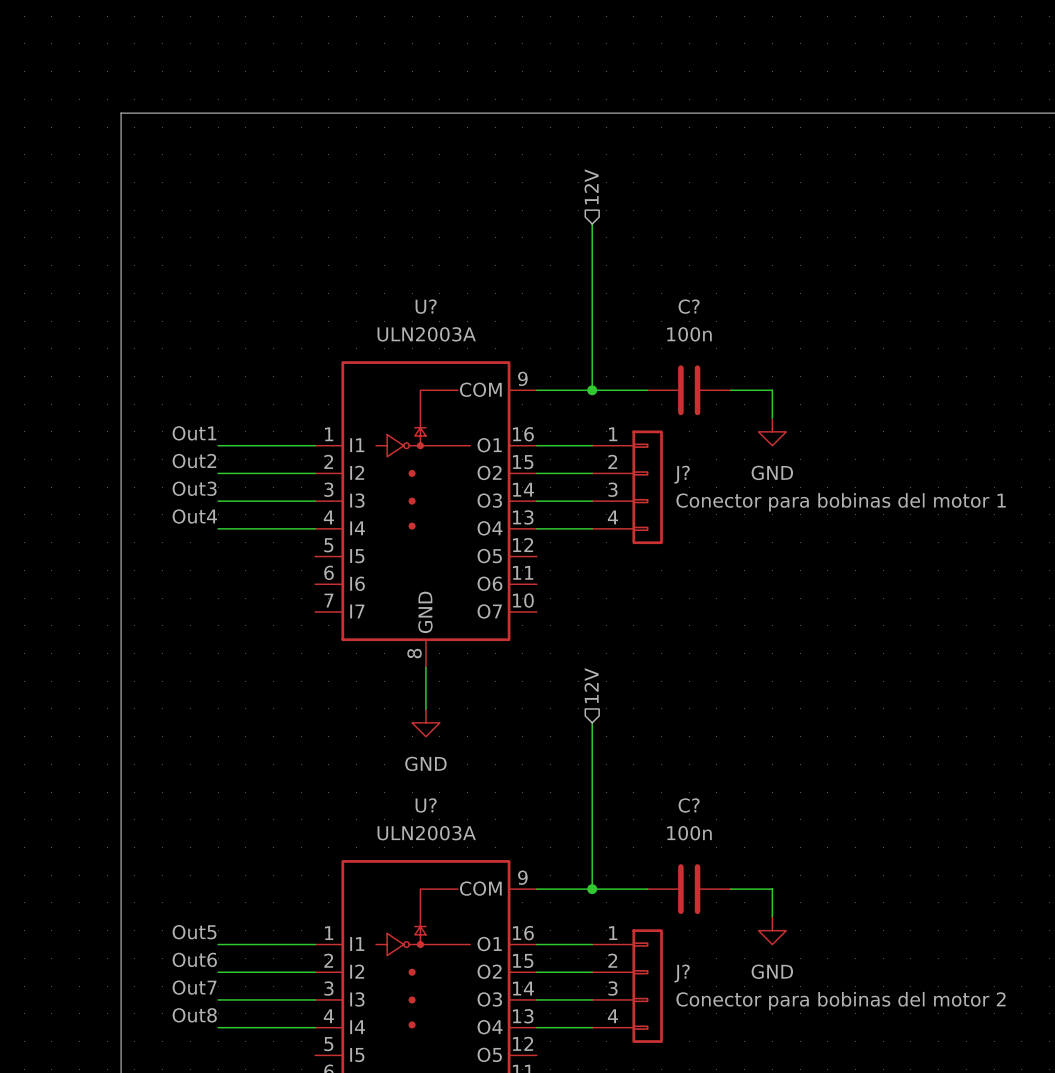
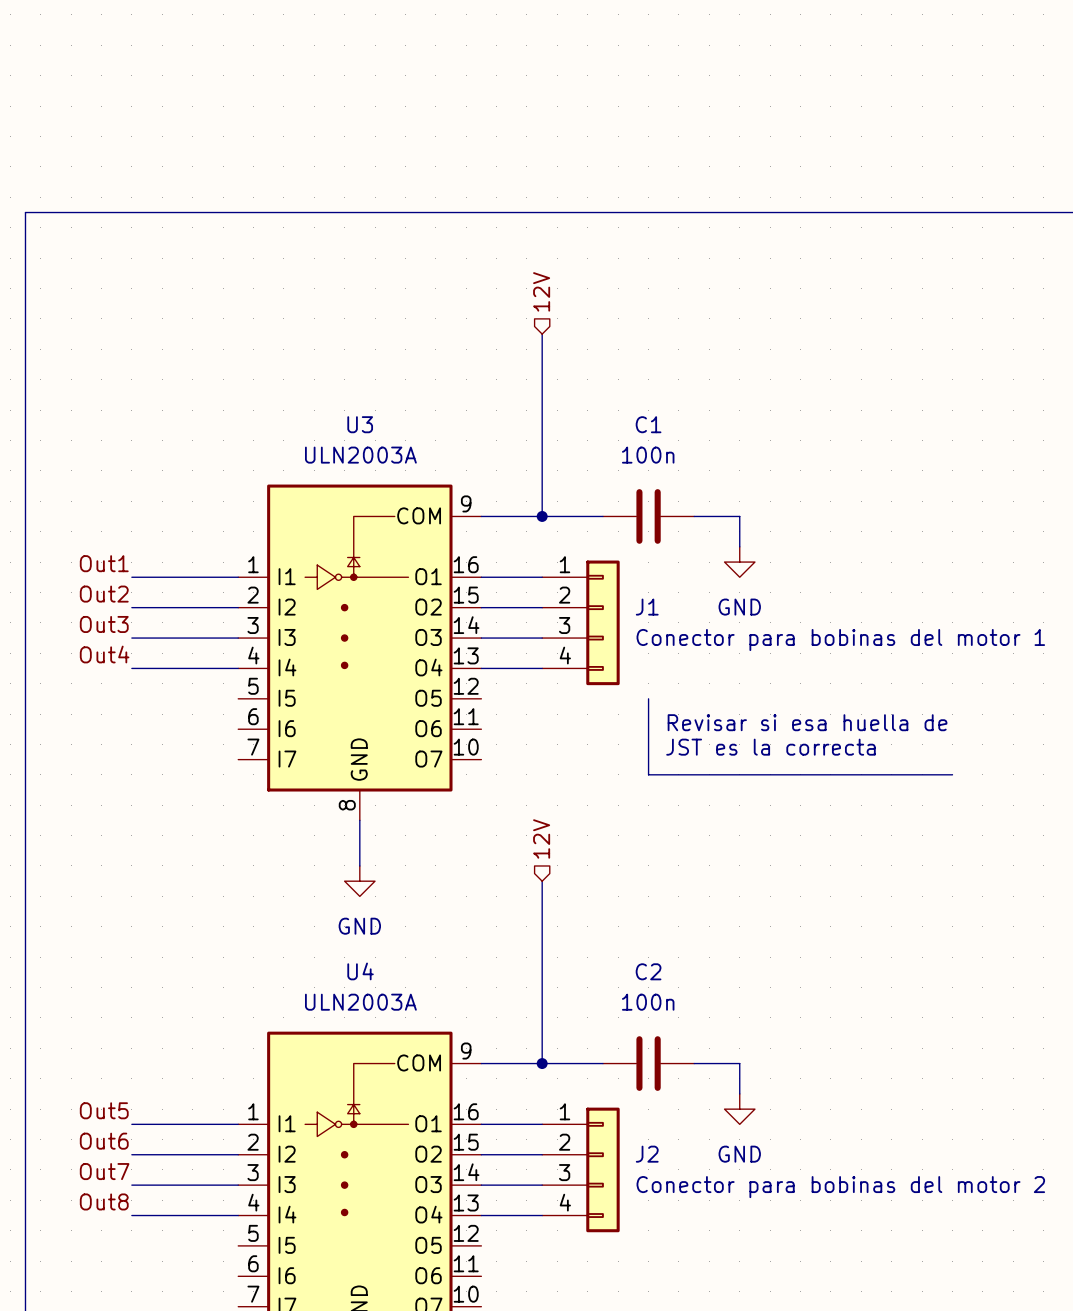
U? name: U? (426, 306) -> U3 (360, 424)
C? name: C? (689, 306) -> C1 (648, 424)
J? name: J? (682, 474) -> J1 (647, 607)
line: none -> (648, 698) (648, 774) (952, 774)
text: none -> Revisar si esa huella de (807, 722)
text: none -> JST es la correcta (770, 747)
U? name: U? (426, 805) -> U4 (360, 971)
C? name: C? (689, 805) -> C2 (648, 971)
J? name: J? (682, 973) -> J2 (647, 1154)

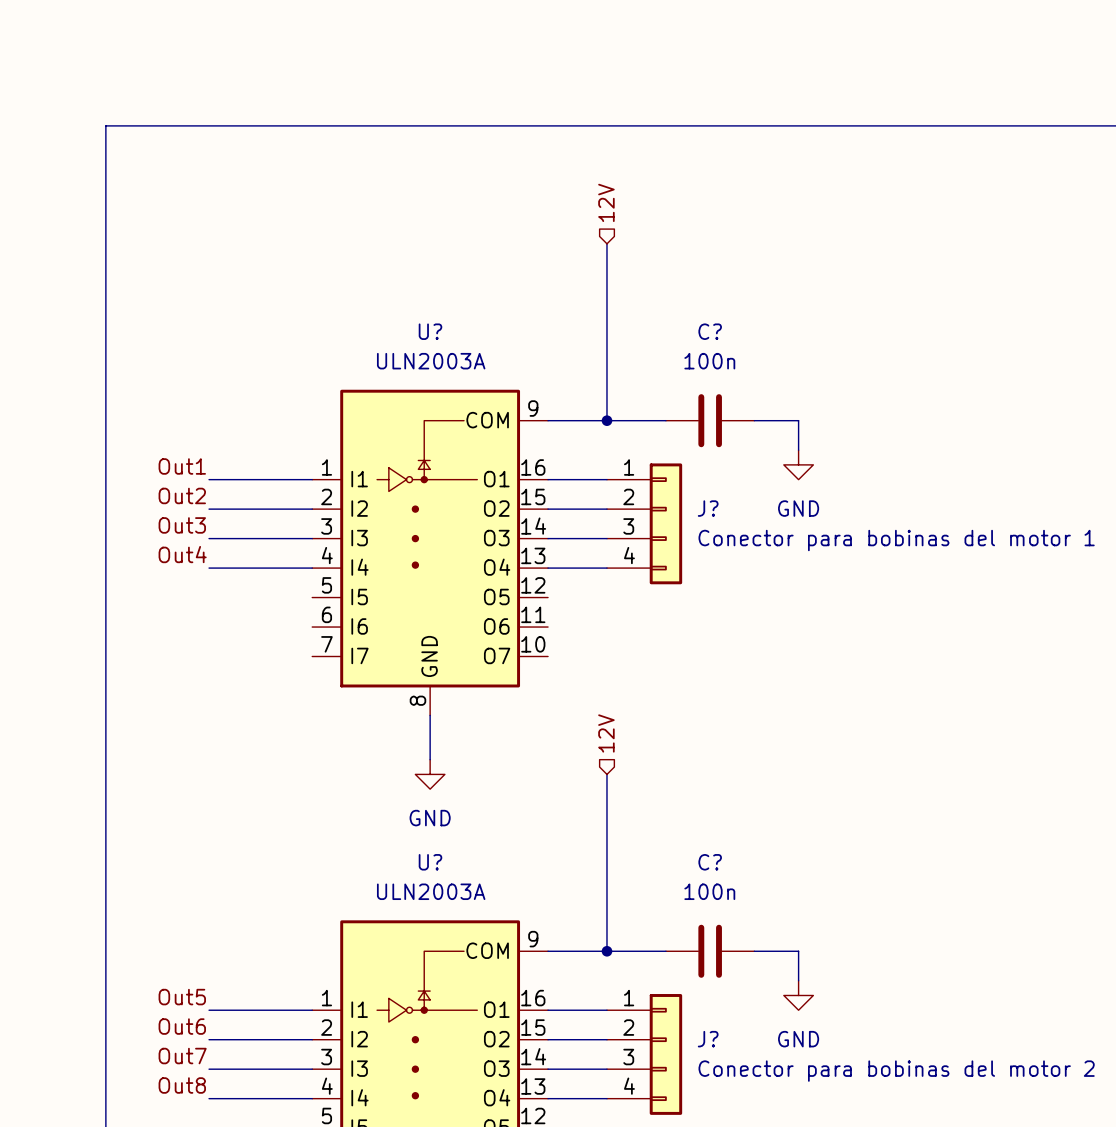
U3 name: U3 (360, 424) -> U? (430, 331)
C1 name: C1 (648, 424) -> C? (710, 331)
J1 name: J1 (647, 607) -> J? (708, 508)
line: (648, 698) (648, 774) (952, 774) -> none
text: Revisar si esa huella de (807, 722) -> none
text: JST es la correcta (770, 747) -> none
U4 name: U4 (360, 971) -> U? (430, 862)
C2 name: C2 (648, 971) -> C? (710, 862)
J2 name: J2 (647, 1154) -> J? (708, 1039)

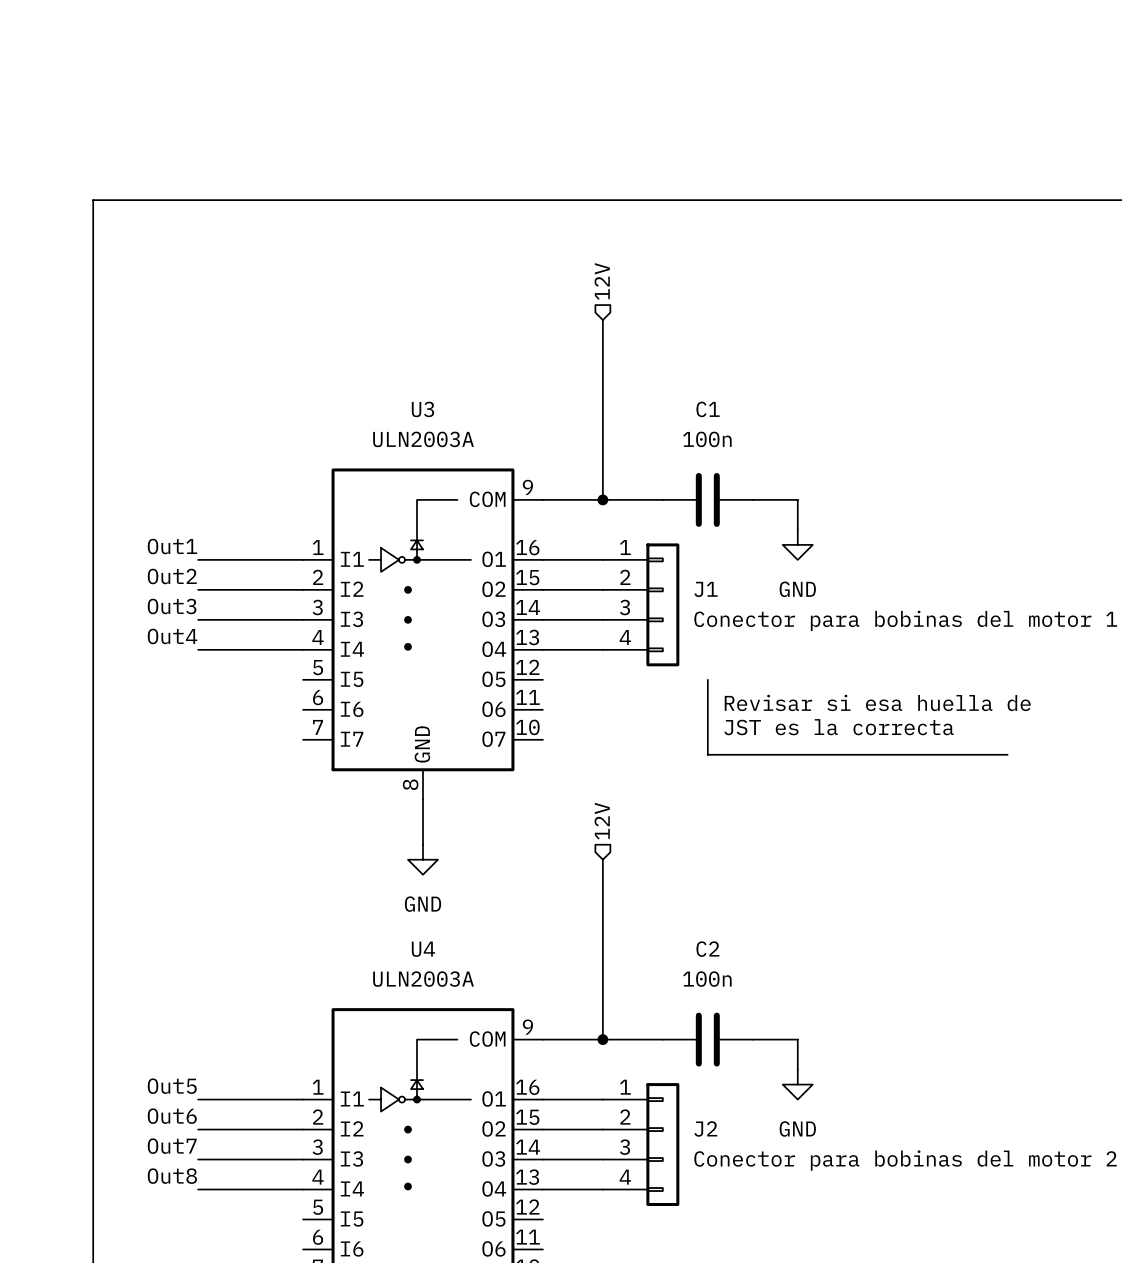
U? name: U? (430, 331) -> U3 (422, 409)
C? name: C? (710, 331) -> C1 (708, 409)
J? name: J? (708, 508) -> J1 (706, 589)
line: none -> (707, 679) (707, 754) (1007, 754)
text: none -> Revisar si esa huella de (877, 702)
text: none -> JST es la correcta (839, 727)
U? name: U? (430, 862) -> U4 (423, 949)
C? name: C? (710, 862) -> C2 (707, 949)
J? name: J? (708, 1039) -> J2 (705, 1128)

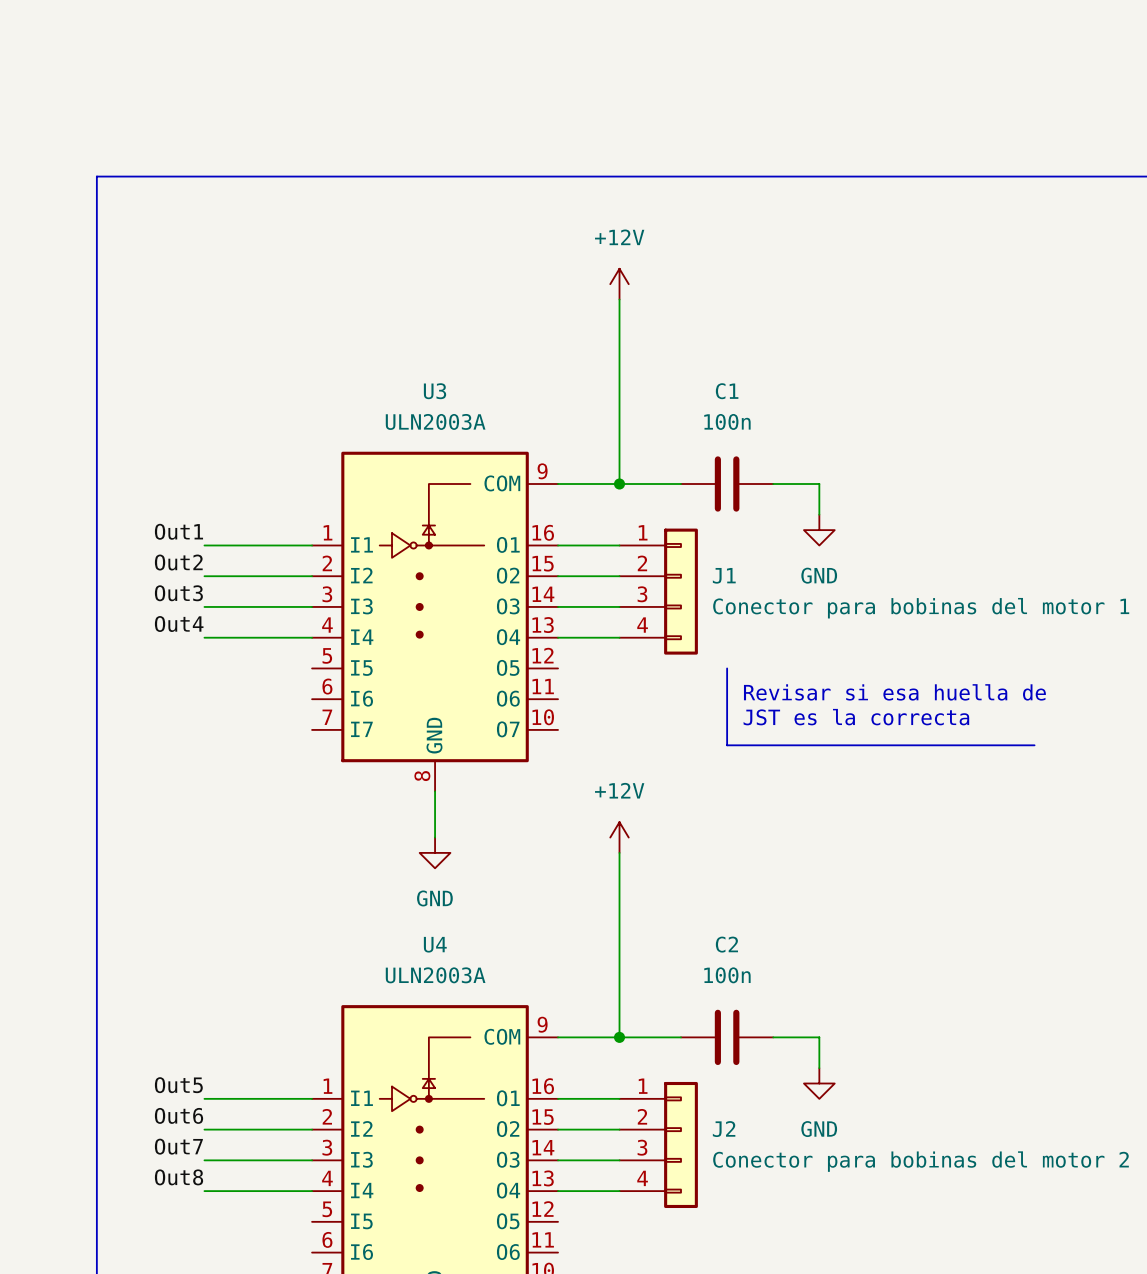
hierarchical label: 12V (602, 281) -> none
power symbol: none -> +12V (619, 284)
hierarchical label: 12V (602, 821) -> none
power symbol: none -> +12V (619, 837)

